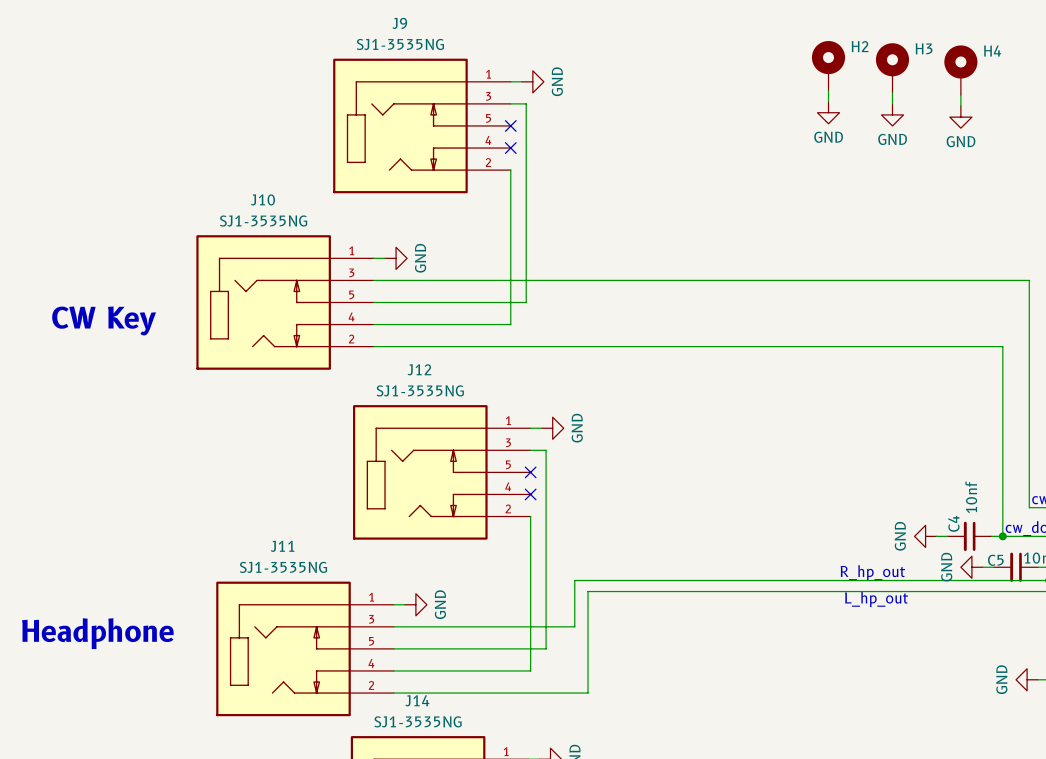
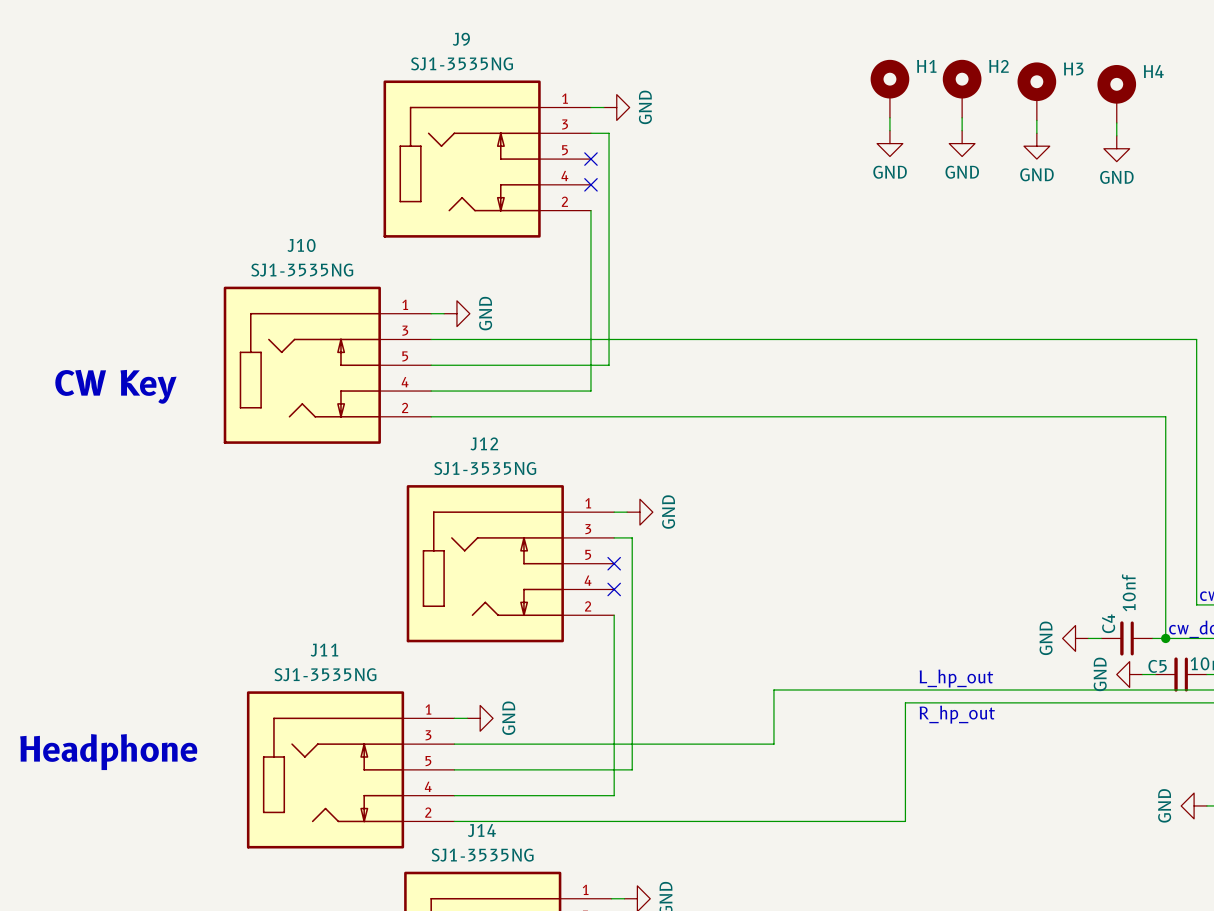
H1: none -> (889, 88)
wire: none -> (889, 117) (889, 130)
power symbol: none -> GND (889, 143)
text position: R_hp_out (872, 572) -> R_hp_out (957, 714)
wire: (667, 580) (574, 580) (574, 626) -> (773, 689) (773, 744) (665, 744)
wire: (779, 591) (588, 591) (588, 693) -> (905, 702) (905, 821) (681, 821)
text position: L_hp_out (876, 599) -> L_hp_out (956, 678)

